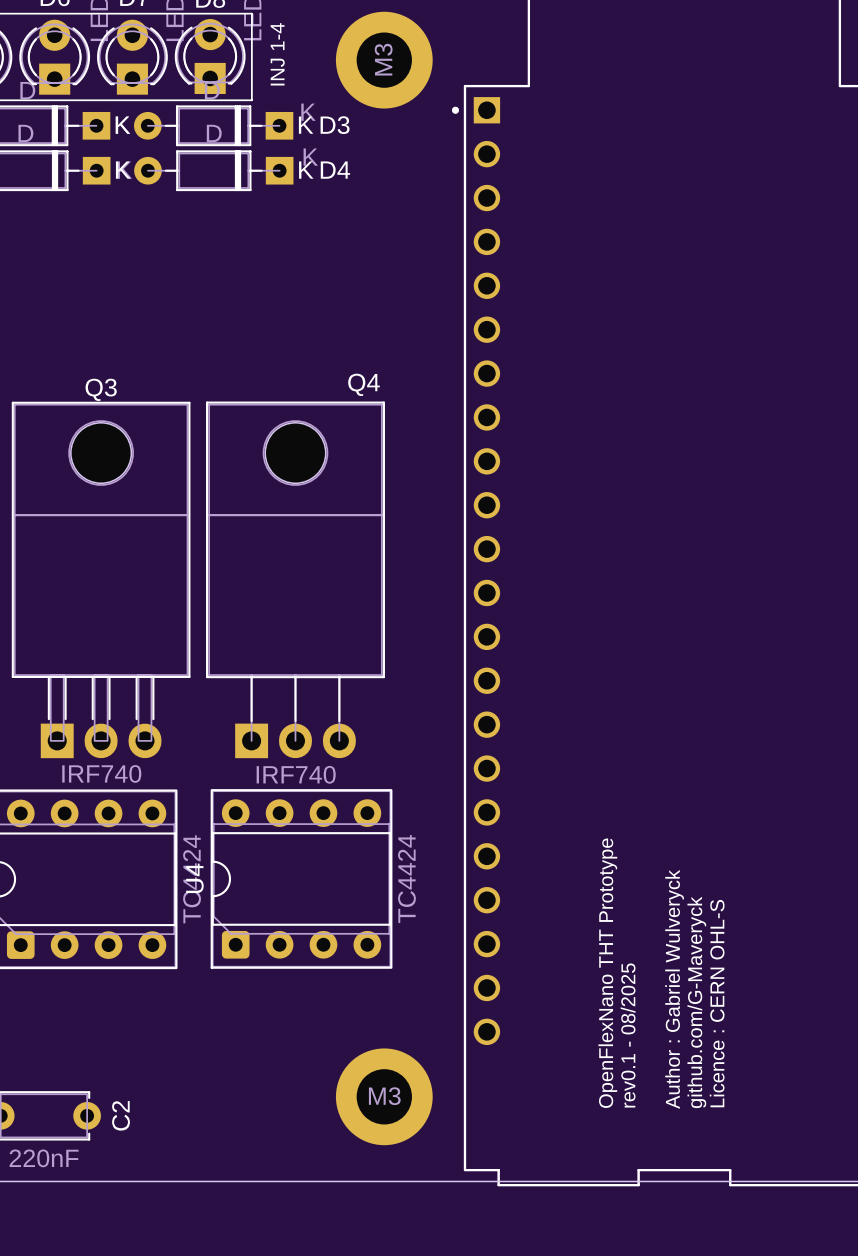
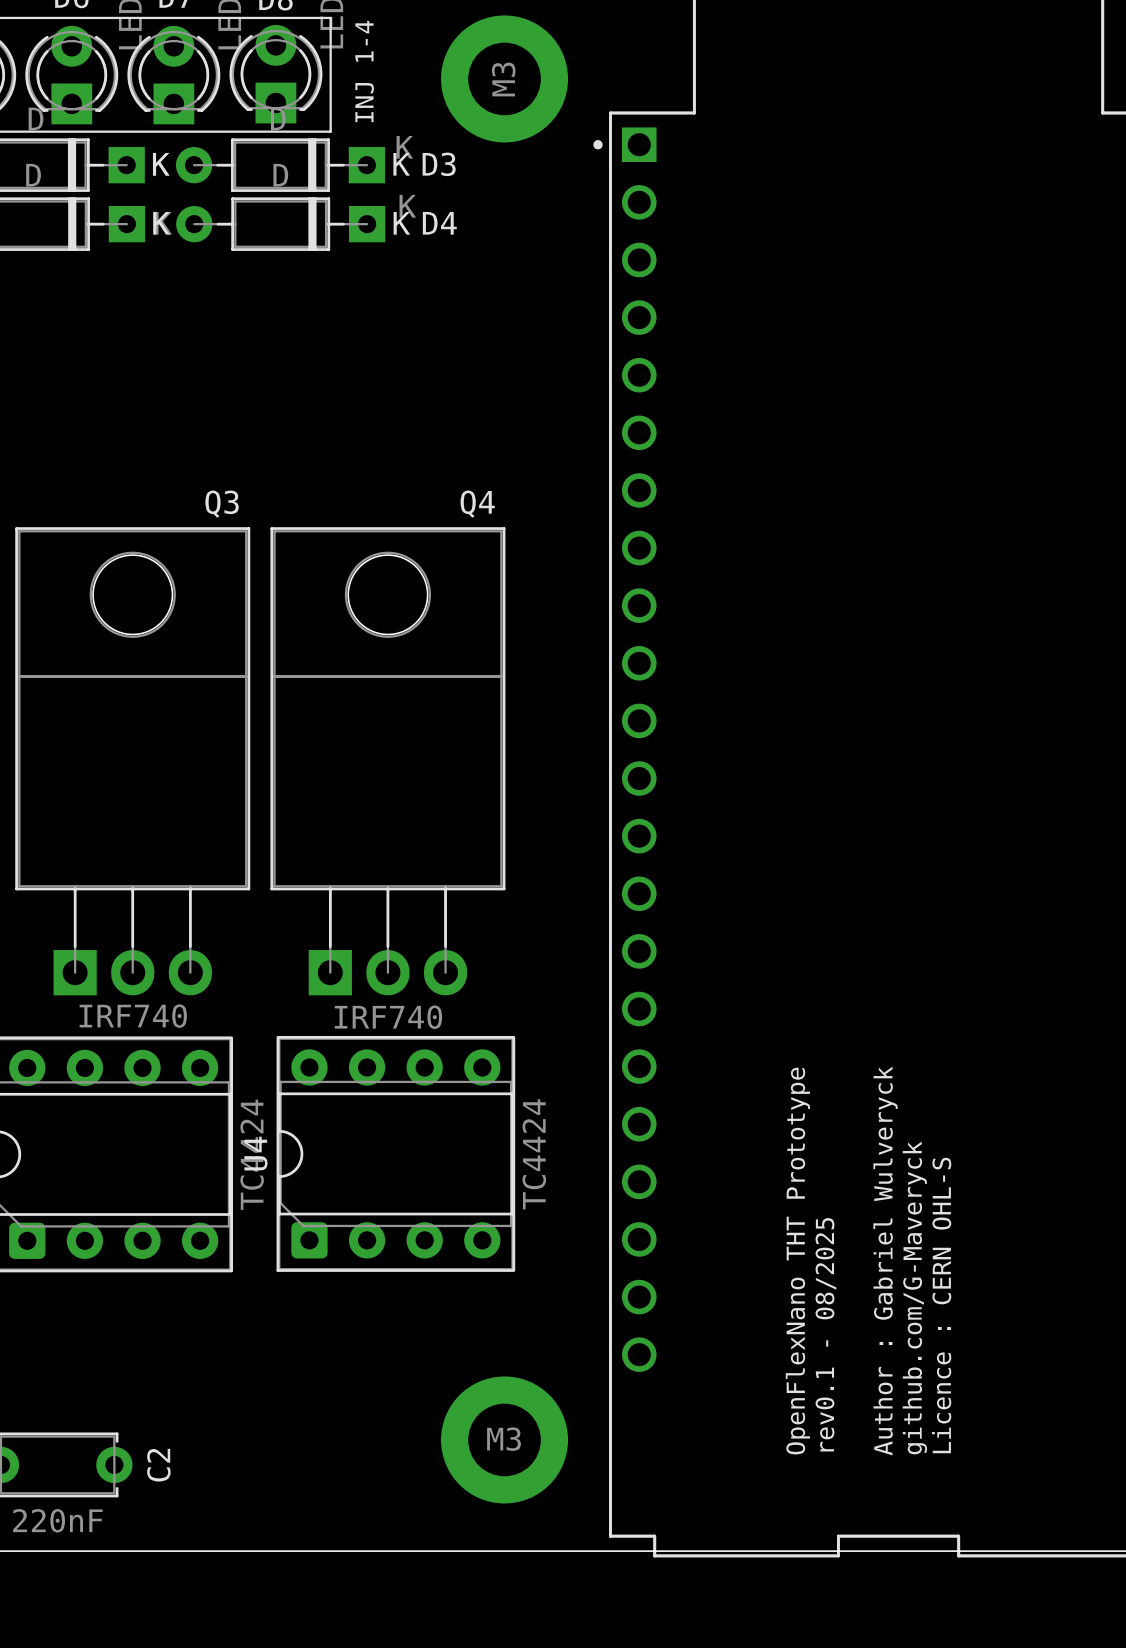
Q3 name position: Q3 (101, 389) -> Q3 (222, 504)
Q3 footprint: [11, 401, 191, 759] -> [15, 527, 251, 996]

